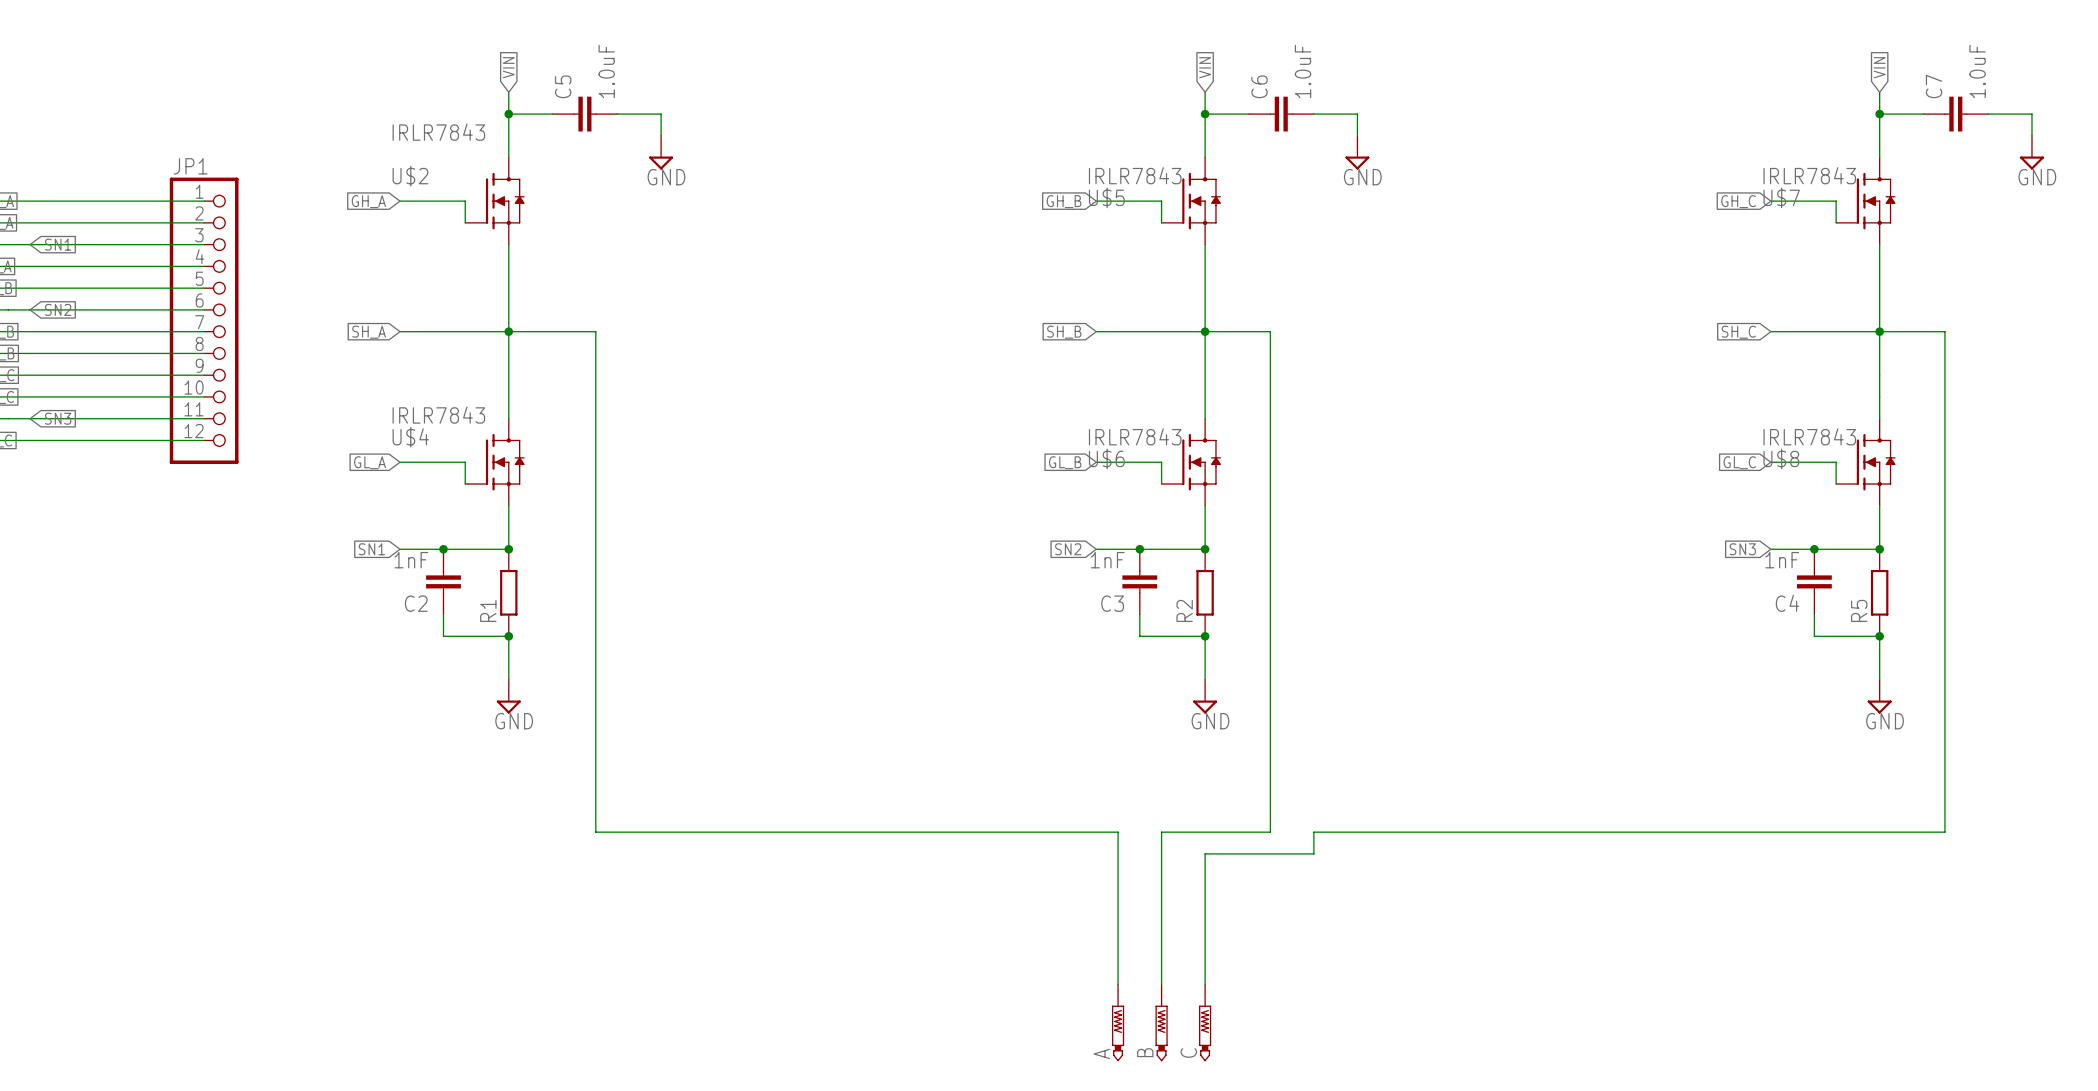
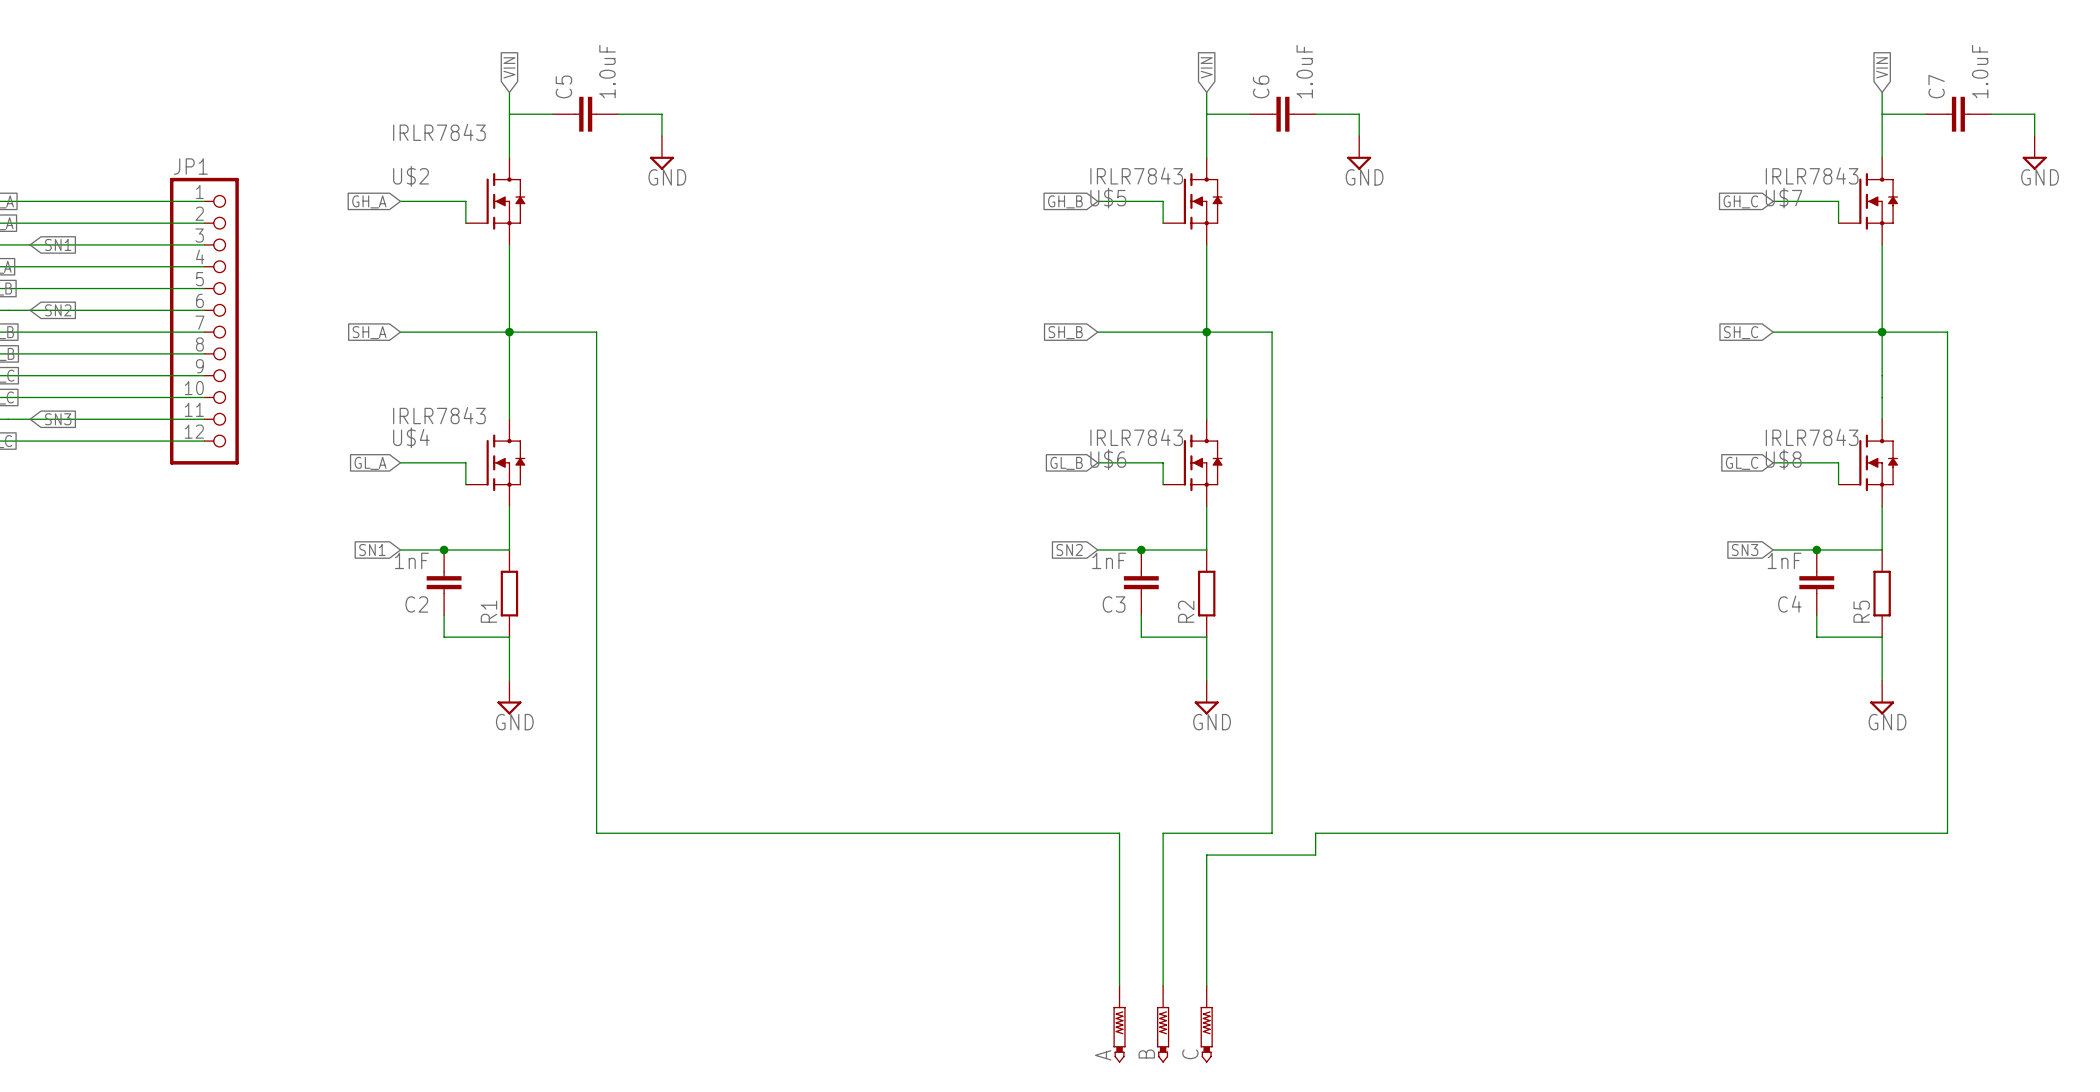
junction: (508, 114) -> none
junction: (1205, 114) -> none
junction: (1879, 114) -> none
junction: (508, 549) -> none
junction: (1205, 549) -> none
junction: (1879, 549) -> none
junction: (508, 636) -> none
junction: (1205, 636) -> none
junction: (1879, 636) -> none

